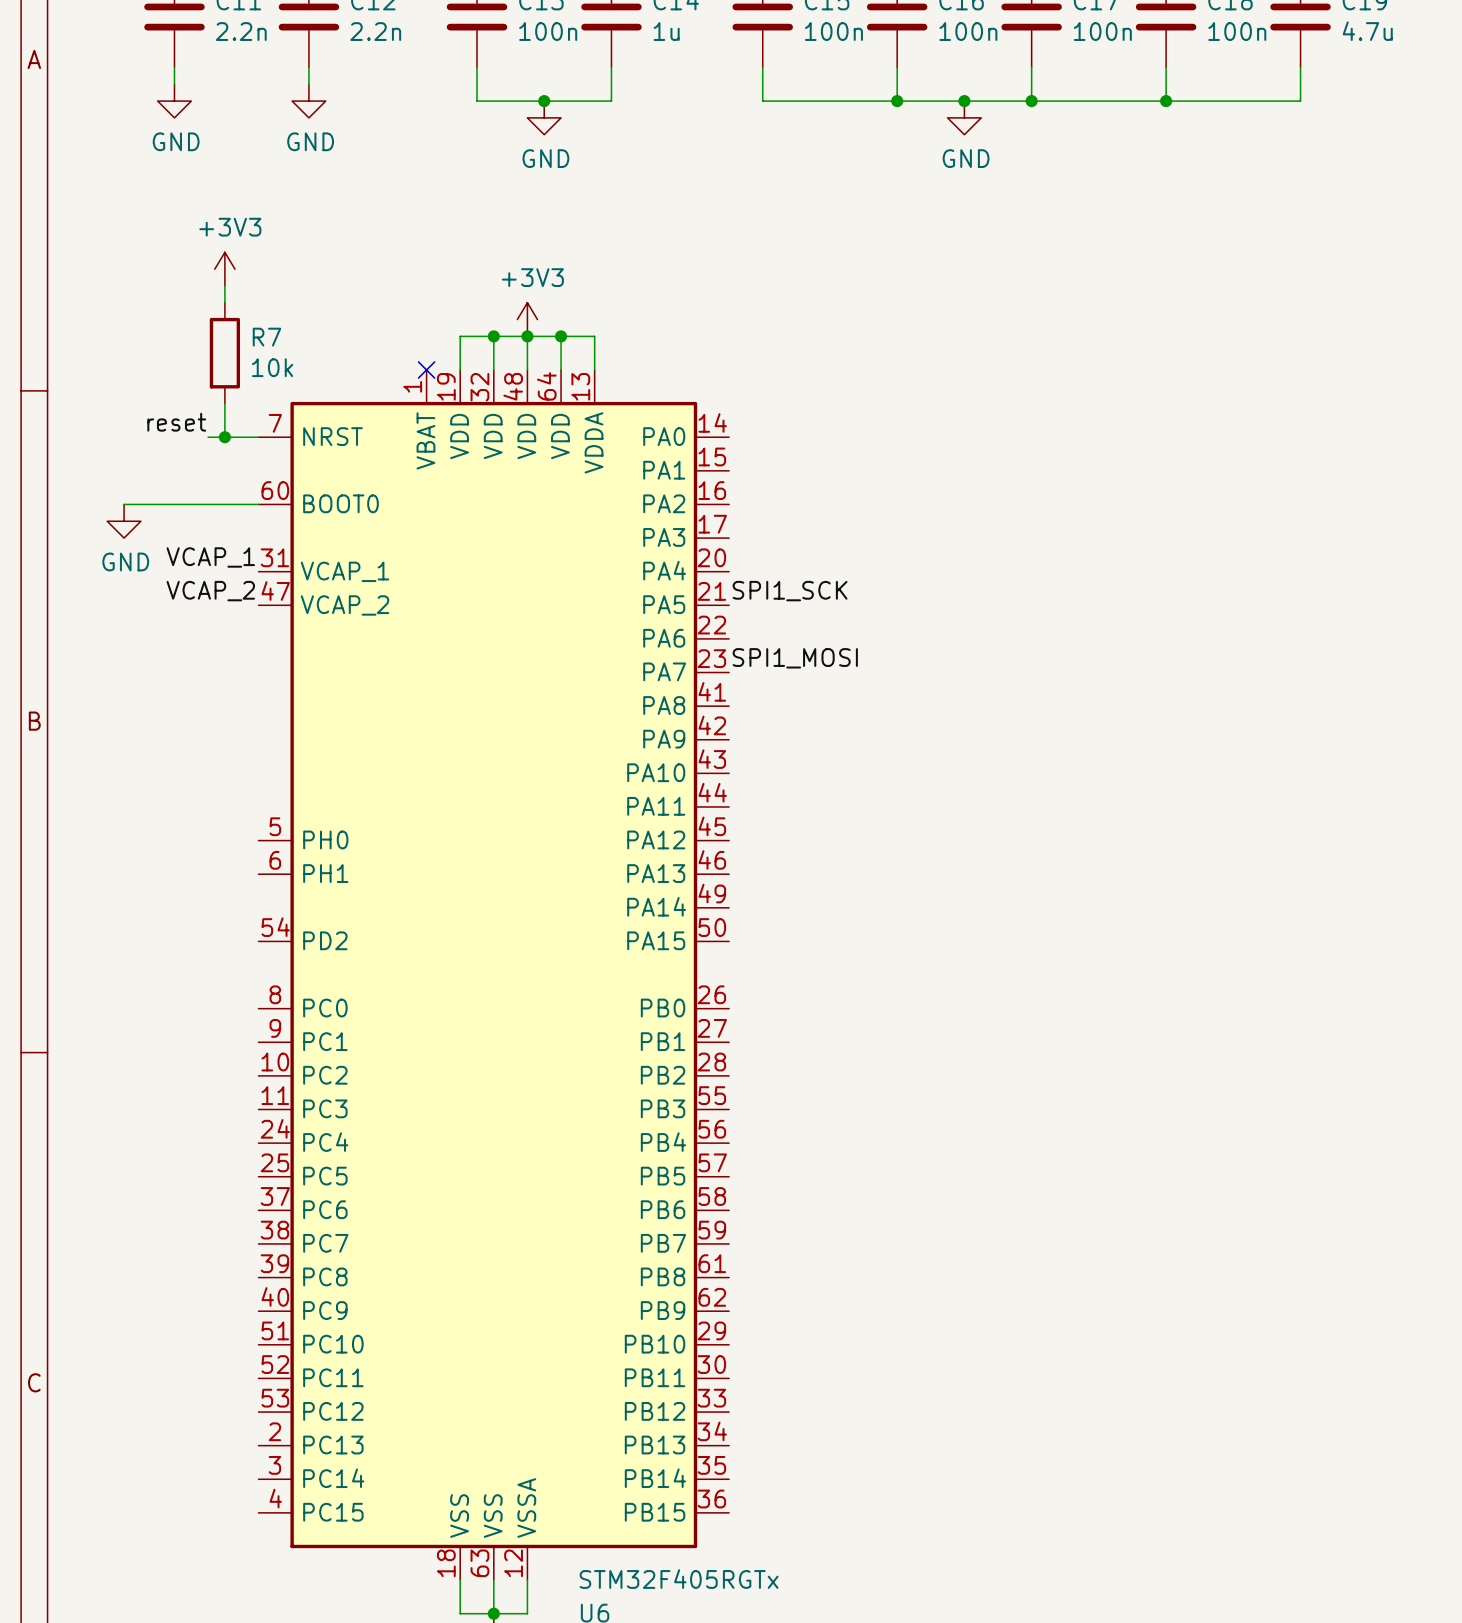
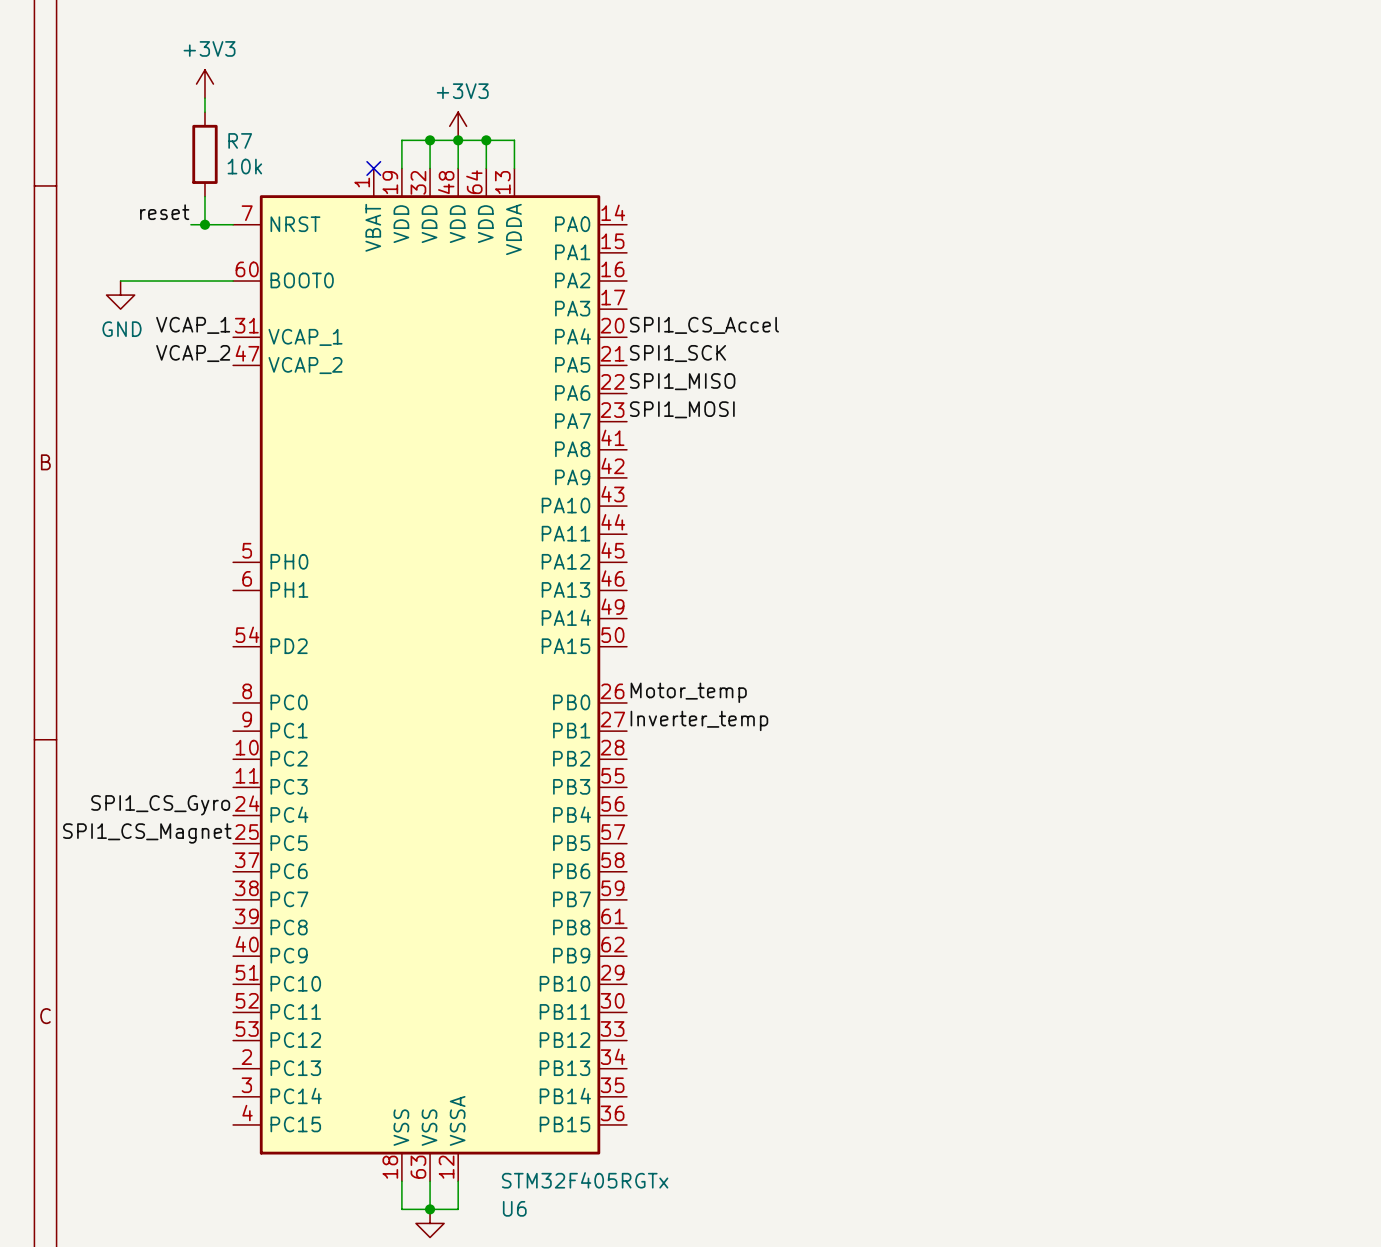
label: none -> SPI1_CS_Accel (704, 325)
label: none -> SPI1_MISO (682, 381)
label: none -> Motor_temp (688, 692)
label: none -> Inverter_temp (699, 720)
label: none -> SPI1_CS_Gyro (160, 805)
label: none -> SPI1_CS_Magnet (147, 833)

